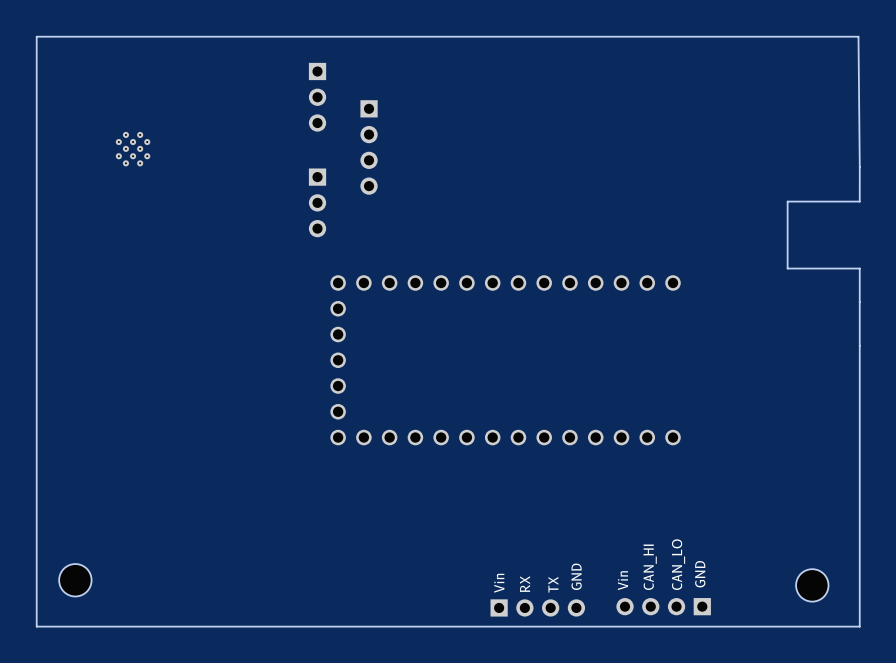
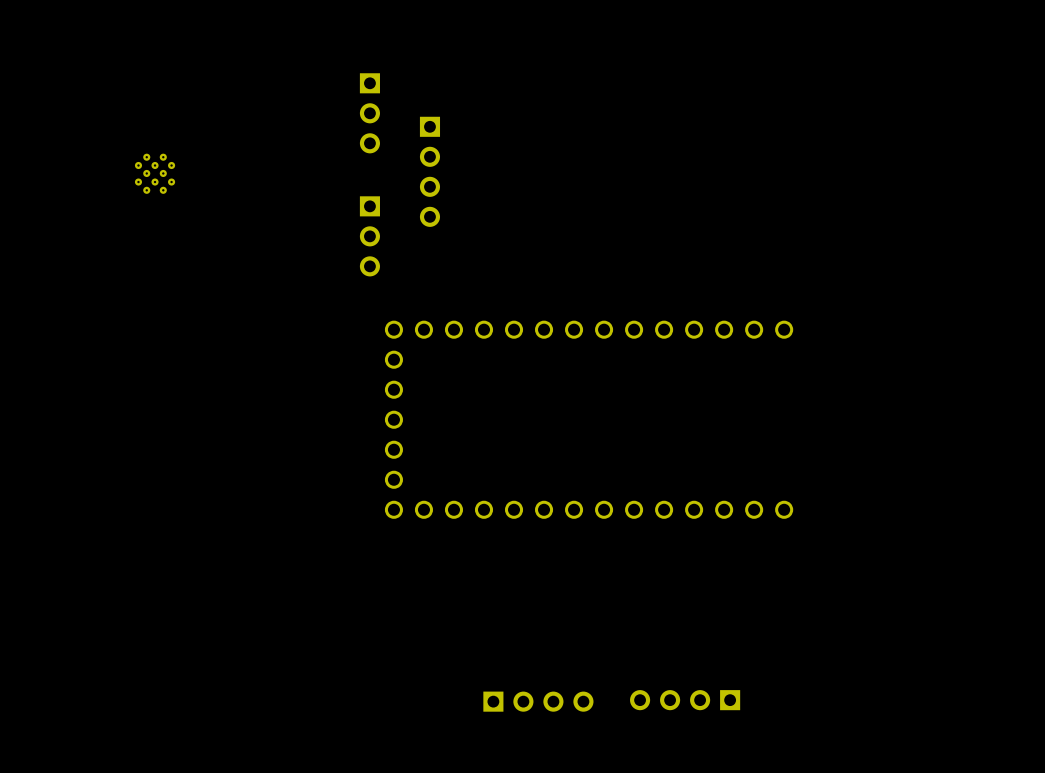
board edge: (858, 36) (36, 36) (36, 626) (859, 626) (859, 268) (787, 268) (787, 201) (859, 201) (858, 36) -> none
text: CAN_LO (678, 564) -> none
text: CAN_HI (650, 567) -> none
text: GND (700, 574) -> none
text: GND (576, 576) -> none
part: (75, 580) -> none
text: Vin (622, 580) -> none
text: Vin (499, 583) -> none
text: RX (525, 584) -> none
text: TX (553, 584) -> none
part: (812, 585) -> none
part: none -> (685, 700)
part: none -> (538, 701)
part: (663, 606) -> none
part: (537, 607) -> none

